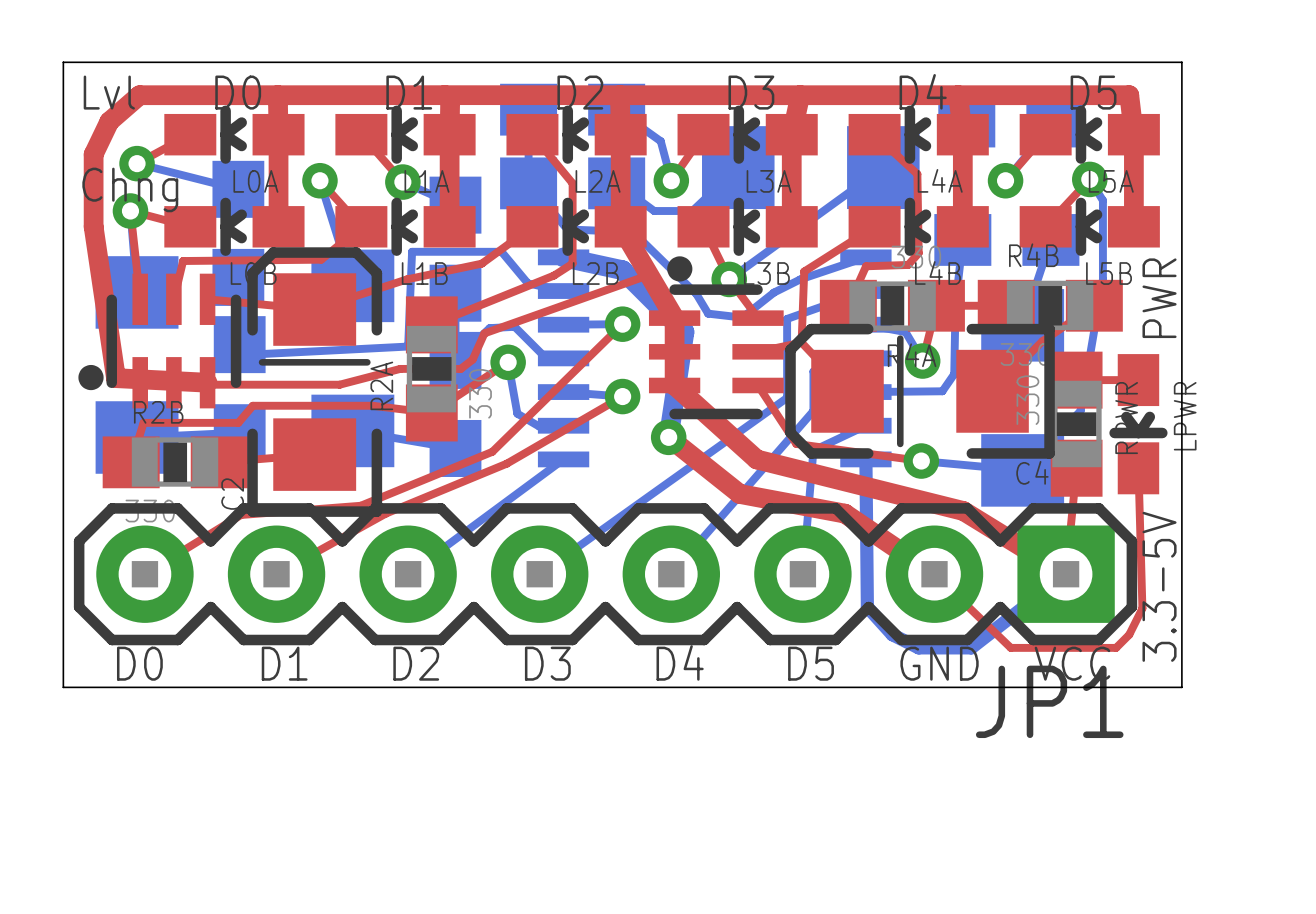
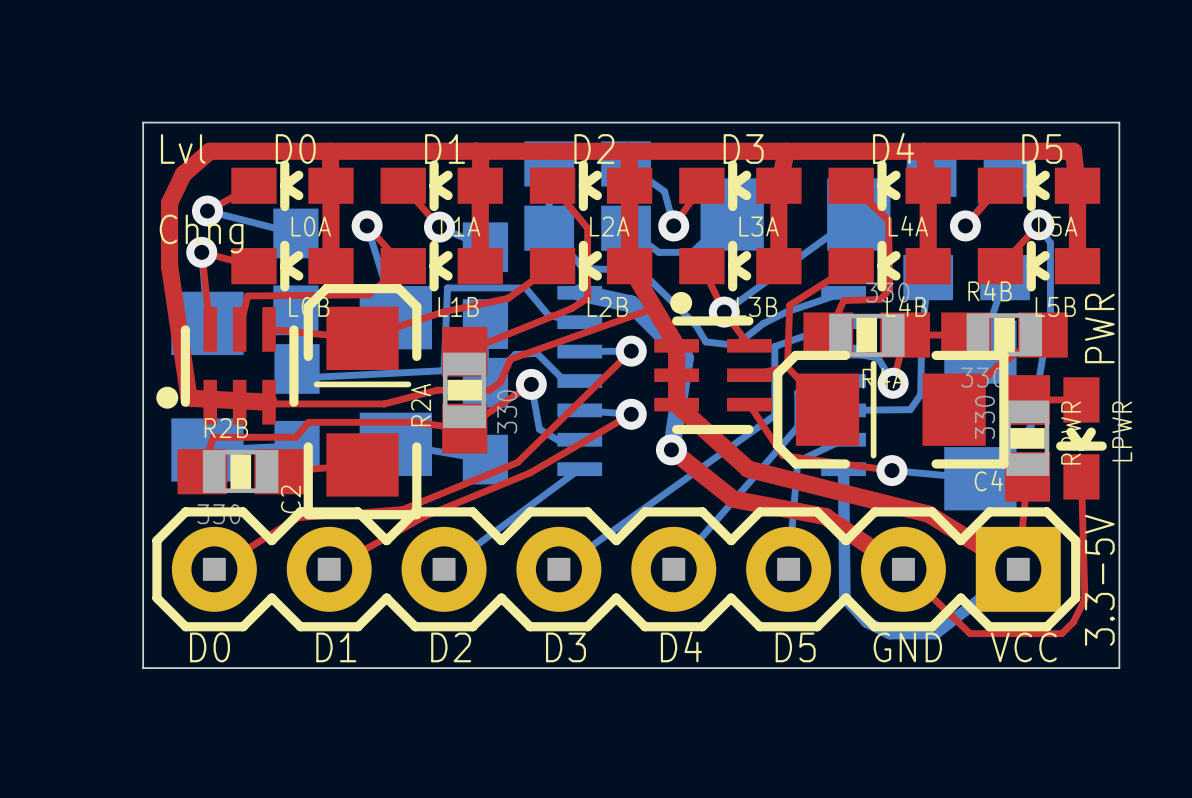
JP1 name: JP1 (1049, 701) -> none

